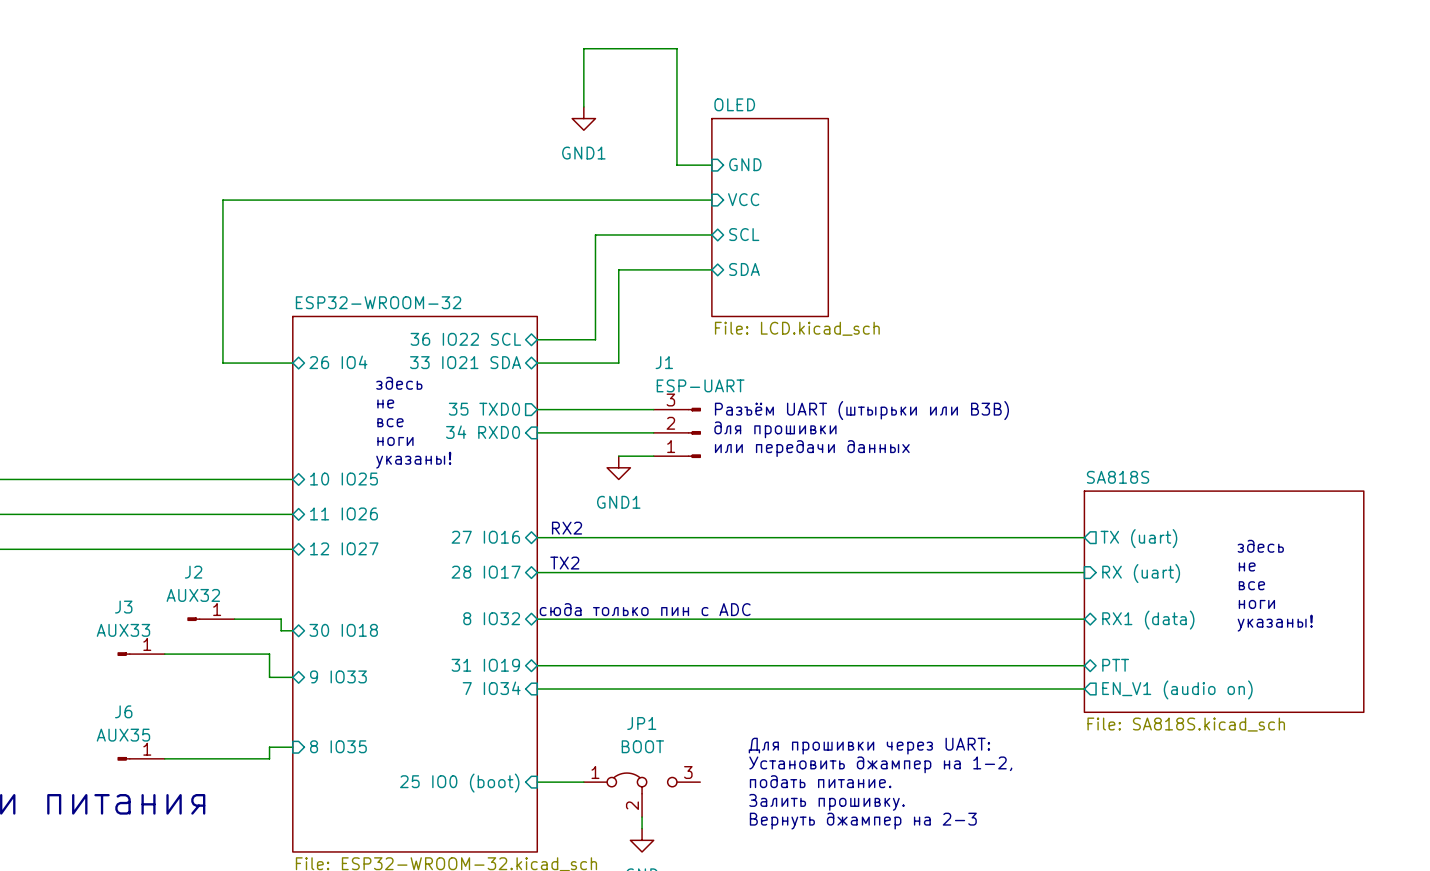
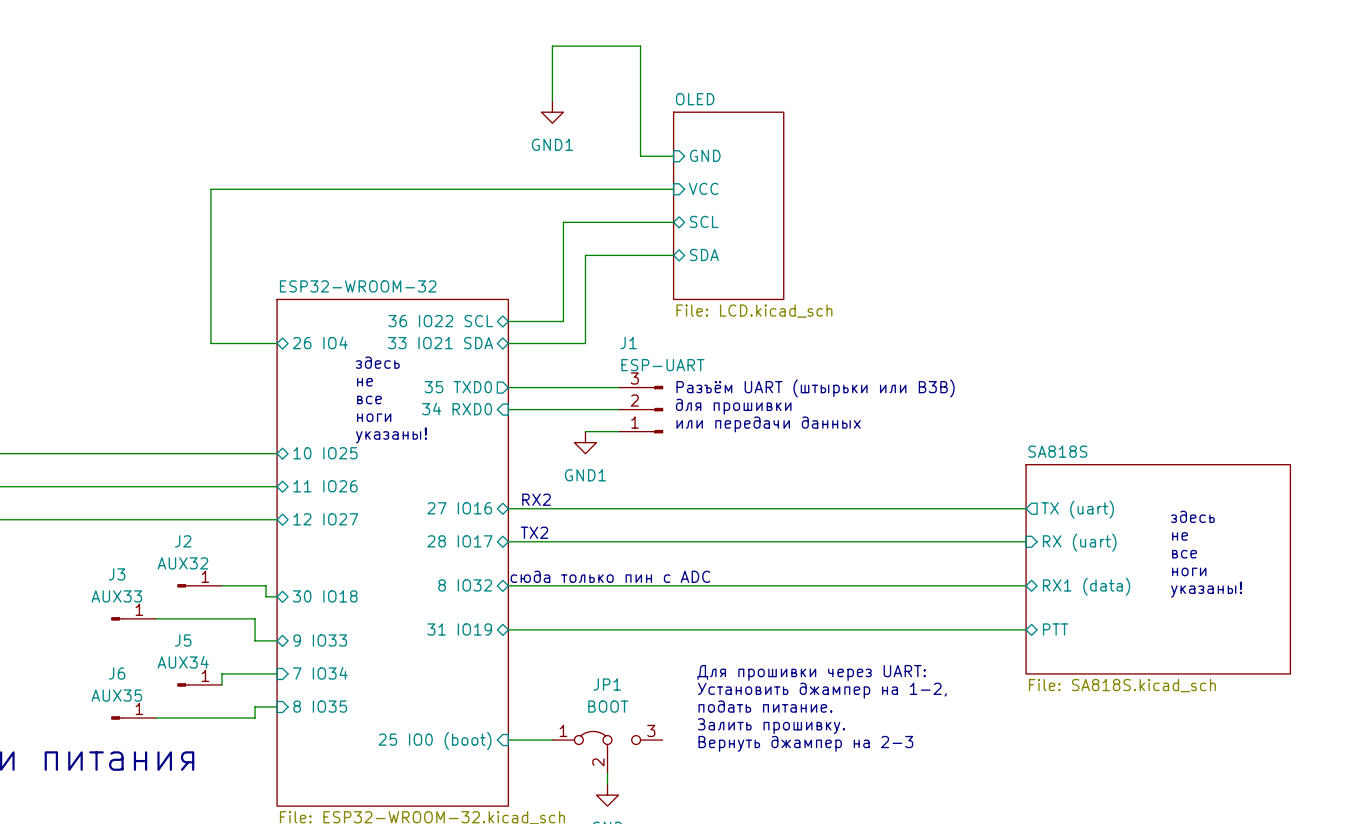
sheet pin rotation: 0° (491, 688) -> 180° (320, 673)
sheet pin position: 7 IO34 (491, 688) -> 7 IO34 (320, 673)
wire: (537, 689) (1084, 689) -> none
sheet pin: EN_V1 (audio on) (1177, 689) -> none
wire: none -> (277, 673) (221, 673) (221, 684)
J5: none -> AUX34 (199, 684)
text position: Для прошивки через UART: (869, 746) -> Для прошивки через UART: (811, 672)
text position: Установить джампер на 1-2, (880, 764) -> Установить джампер на 1-2, (822, 690)
text position: подать питание. (820, 781) -> подать питание. (765, 706)
text position: Залить прошивку. (827, 802) -> Залить прошивку. (771, 726)
text position: Вернуть джампер на 2-3 (863, 821) -> Вернуть джампер на 2-3 (805, 743)

